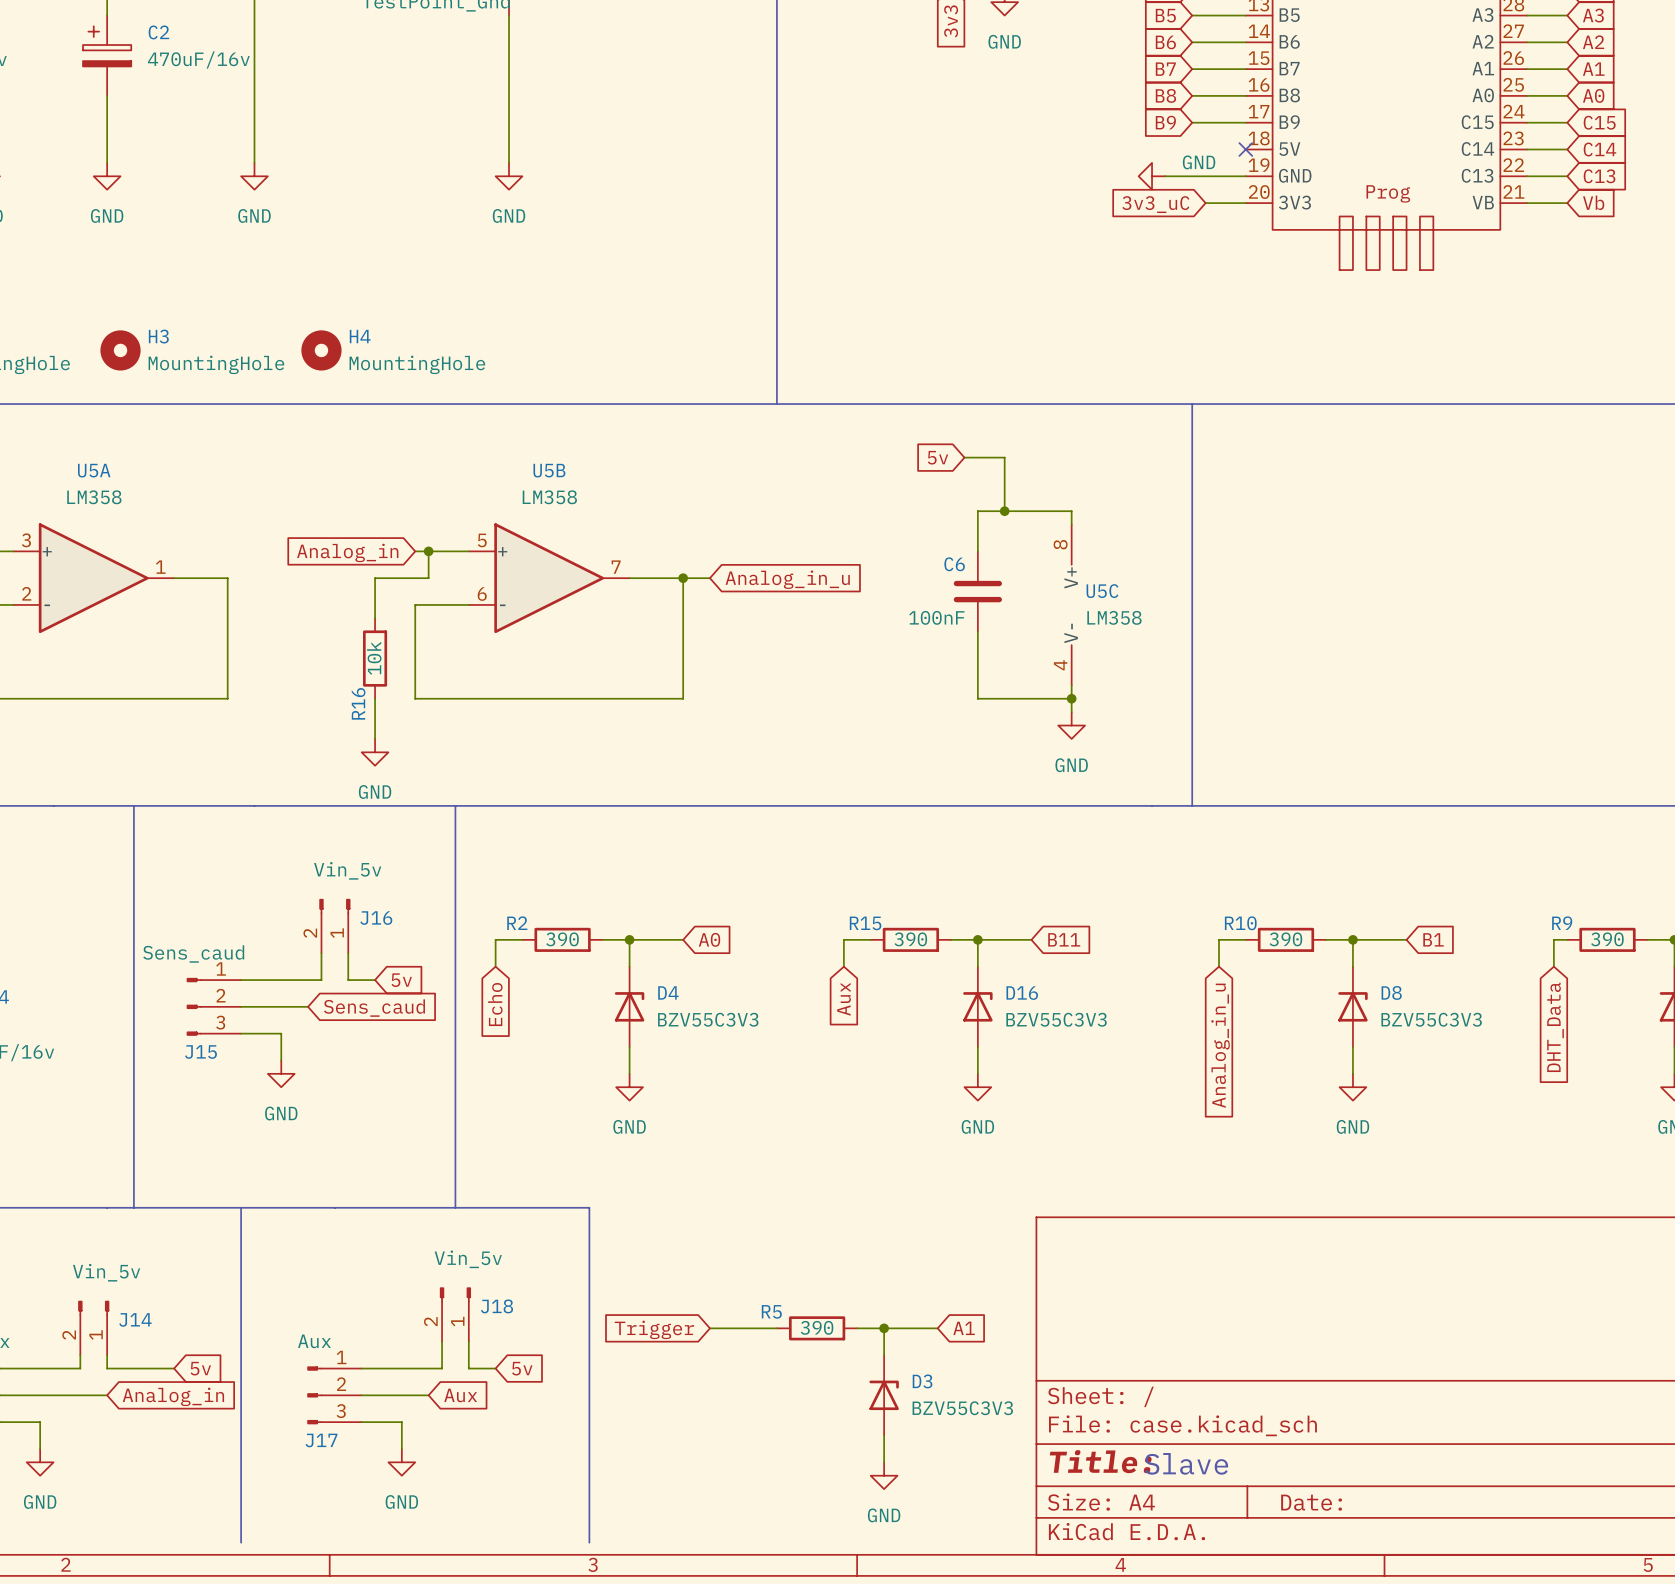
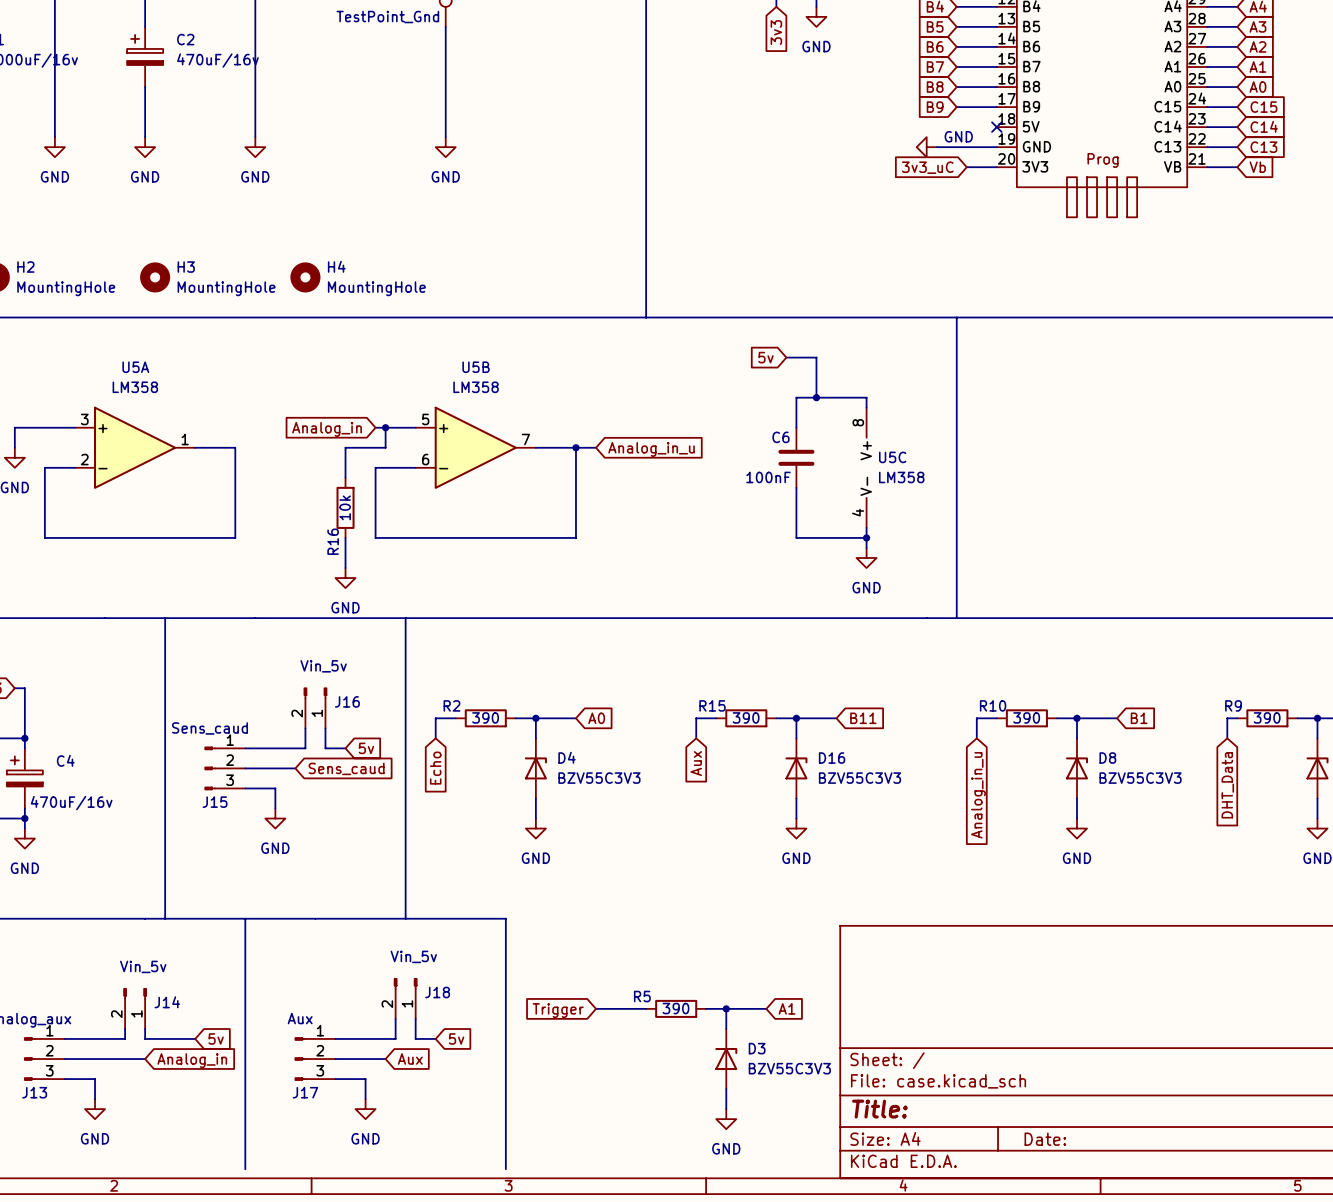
text: Slave (1186, 1463) -> none

